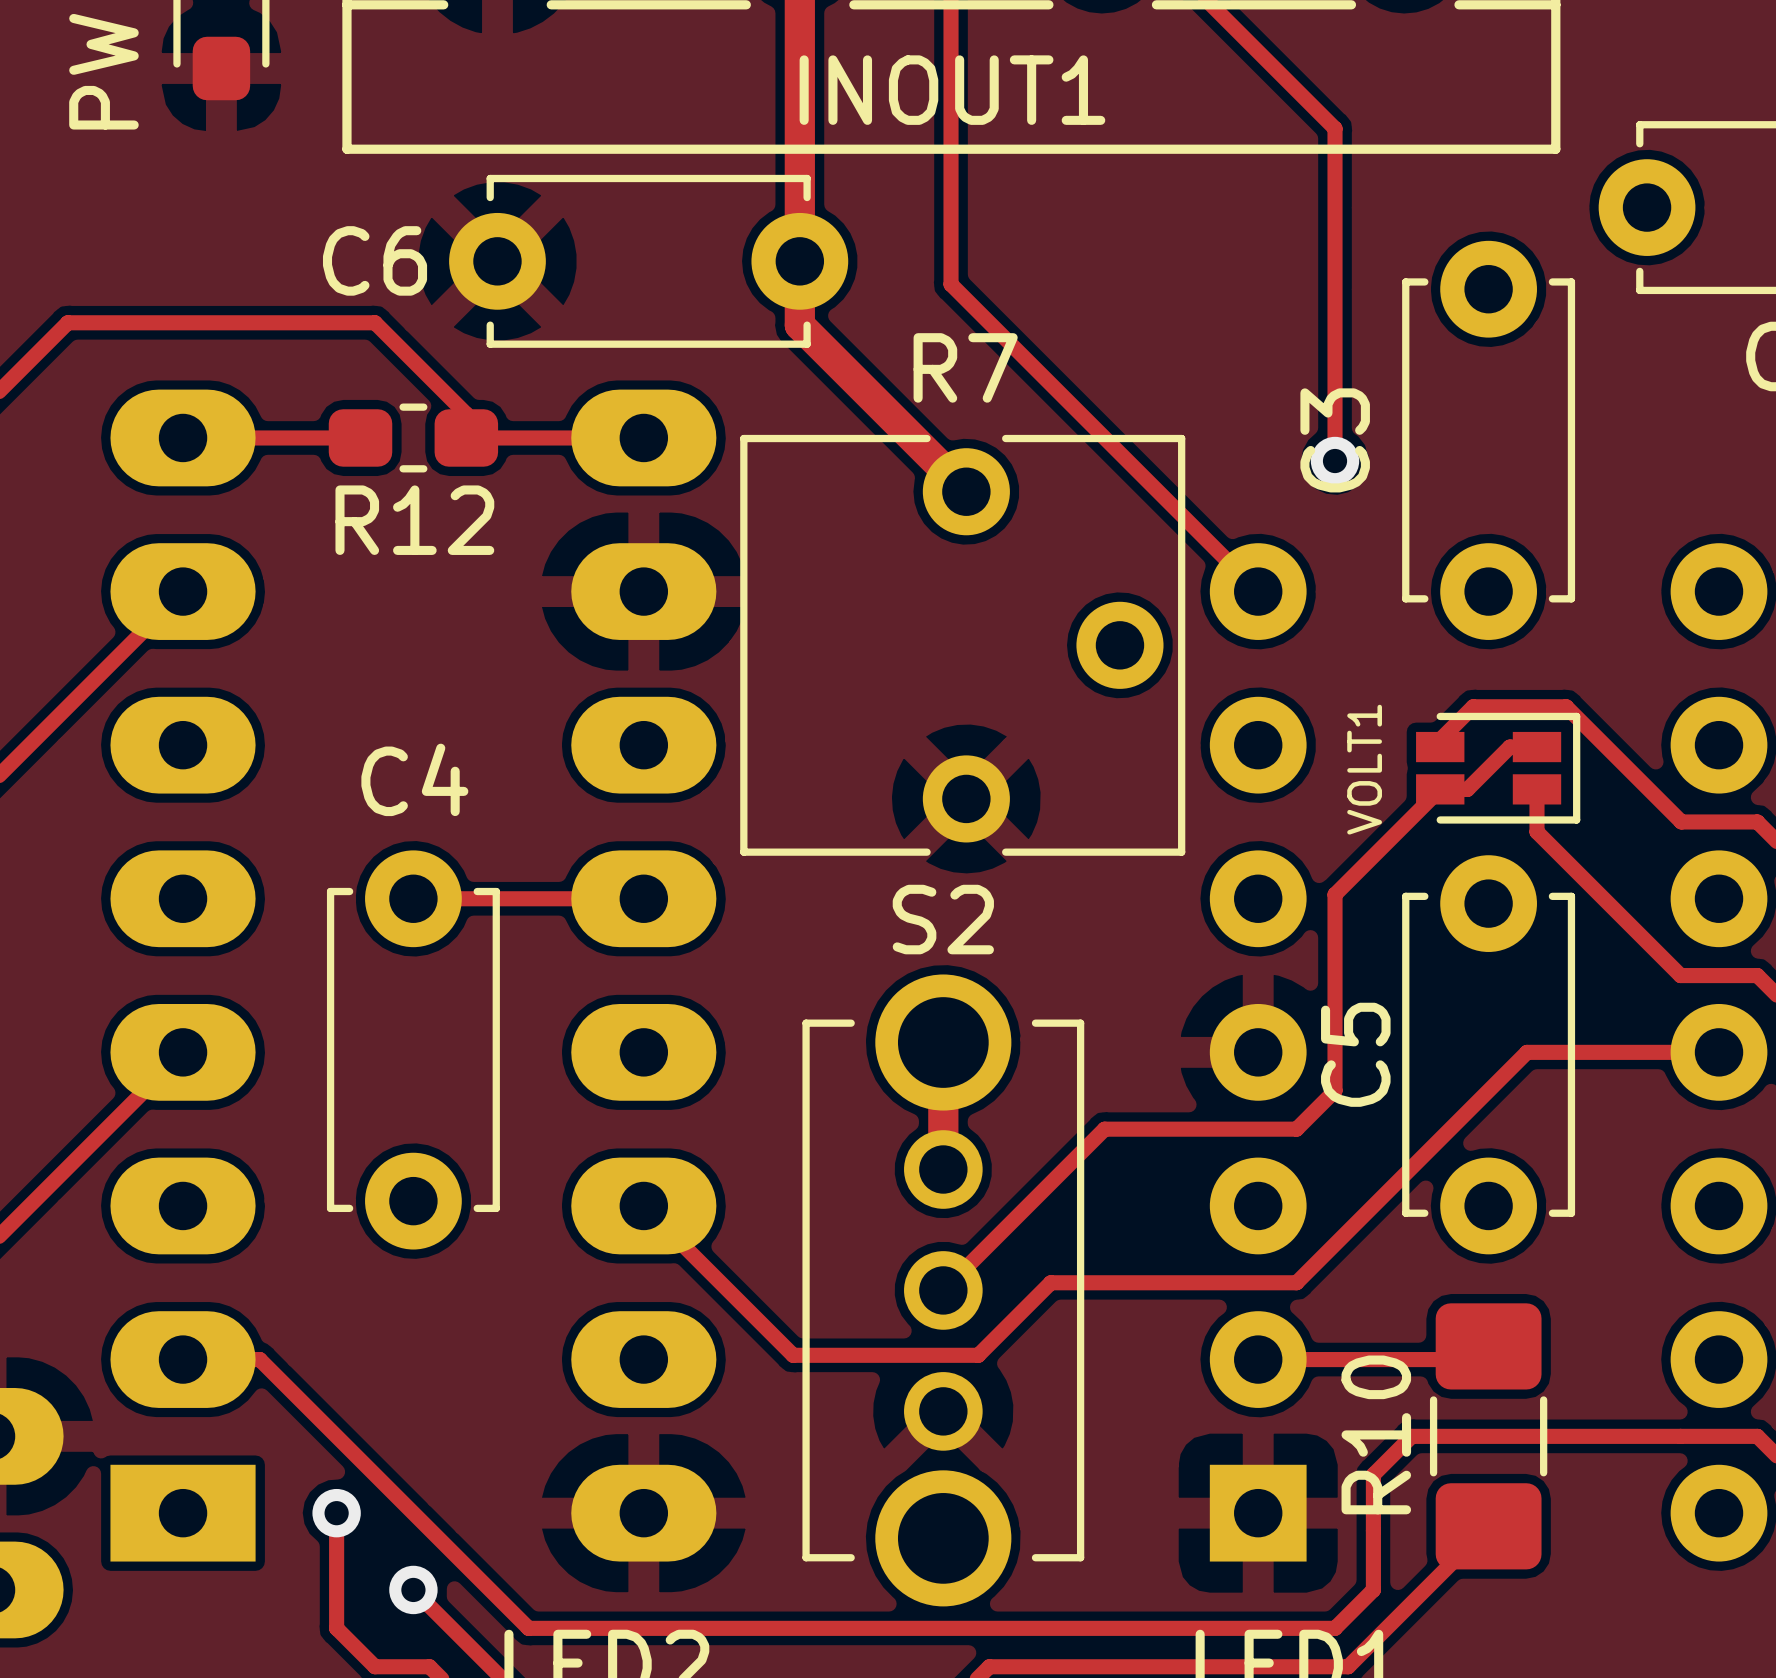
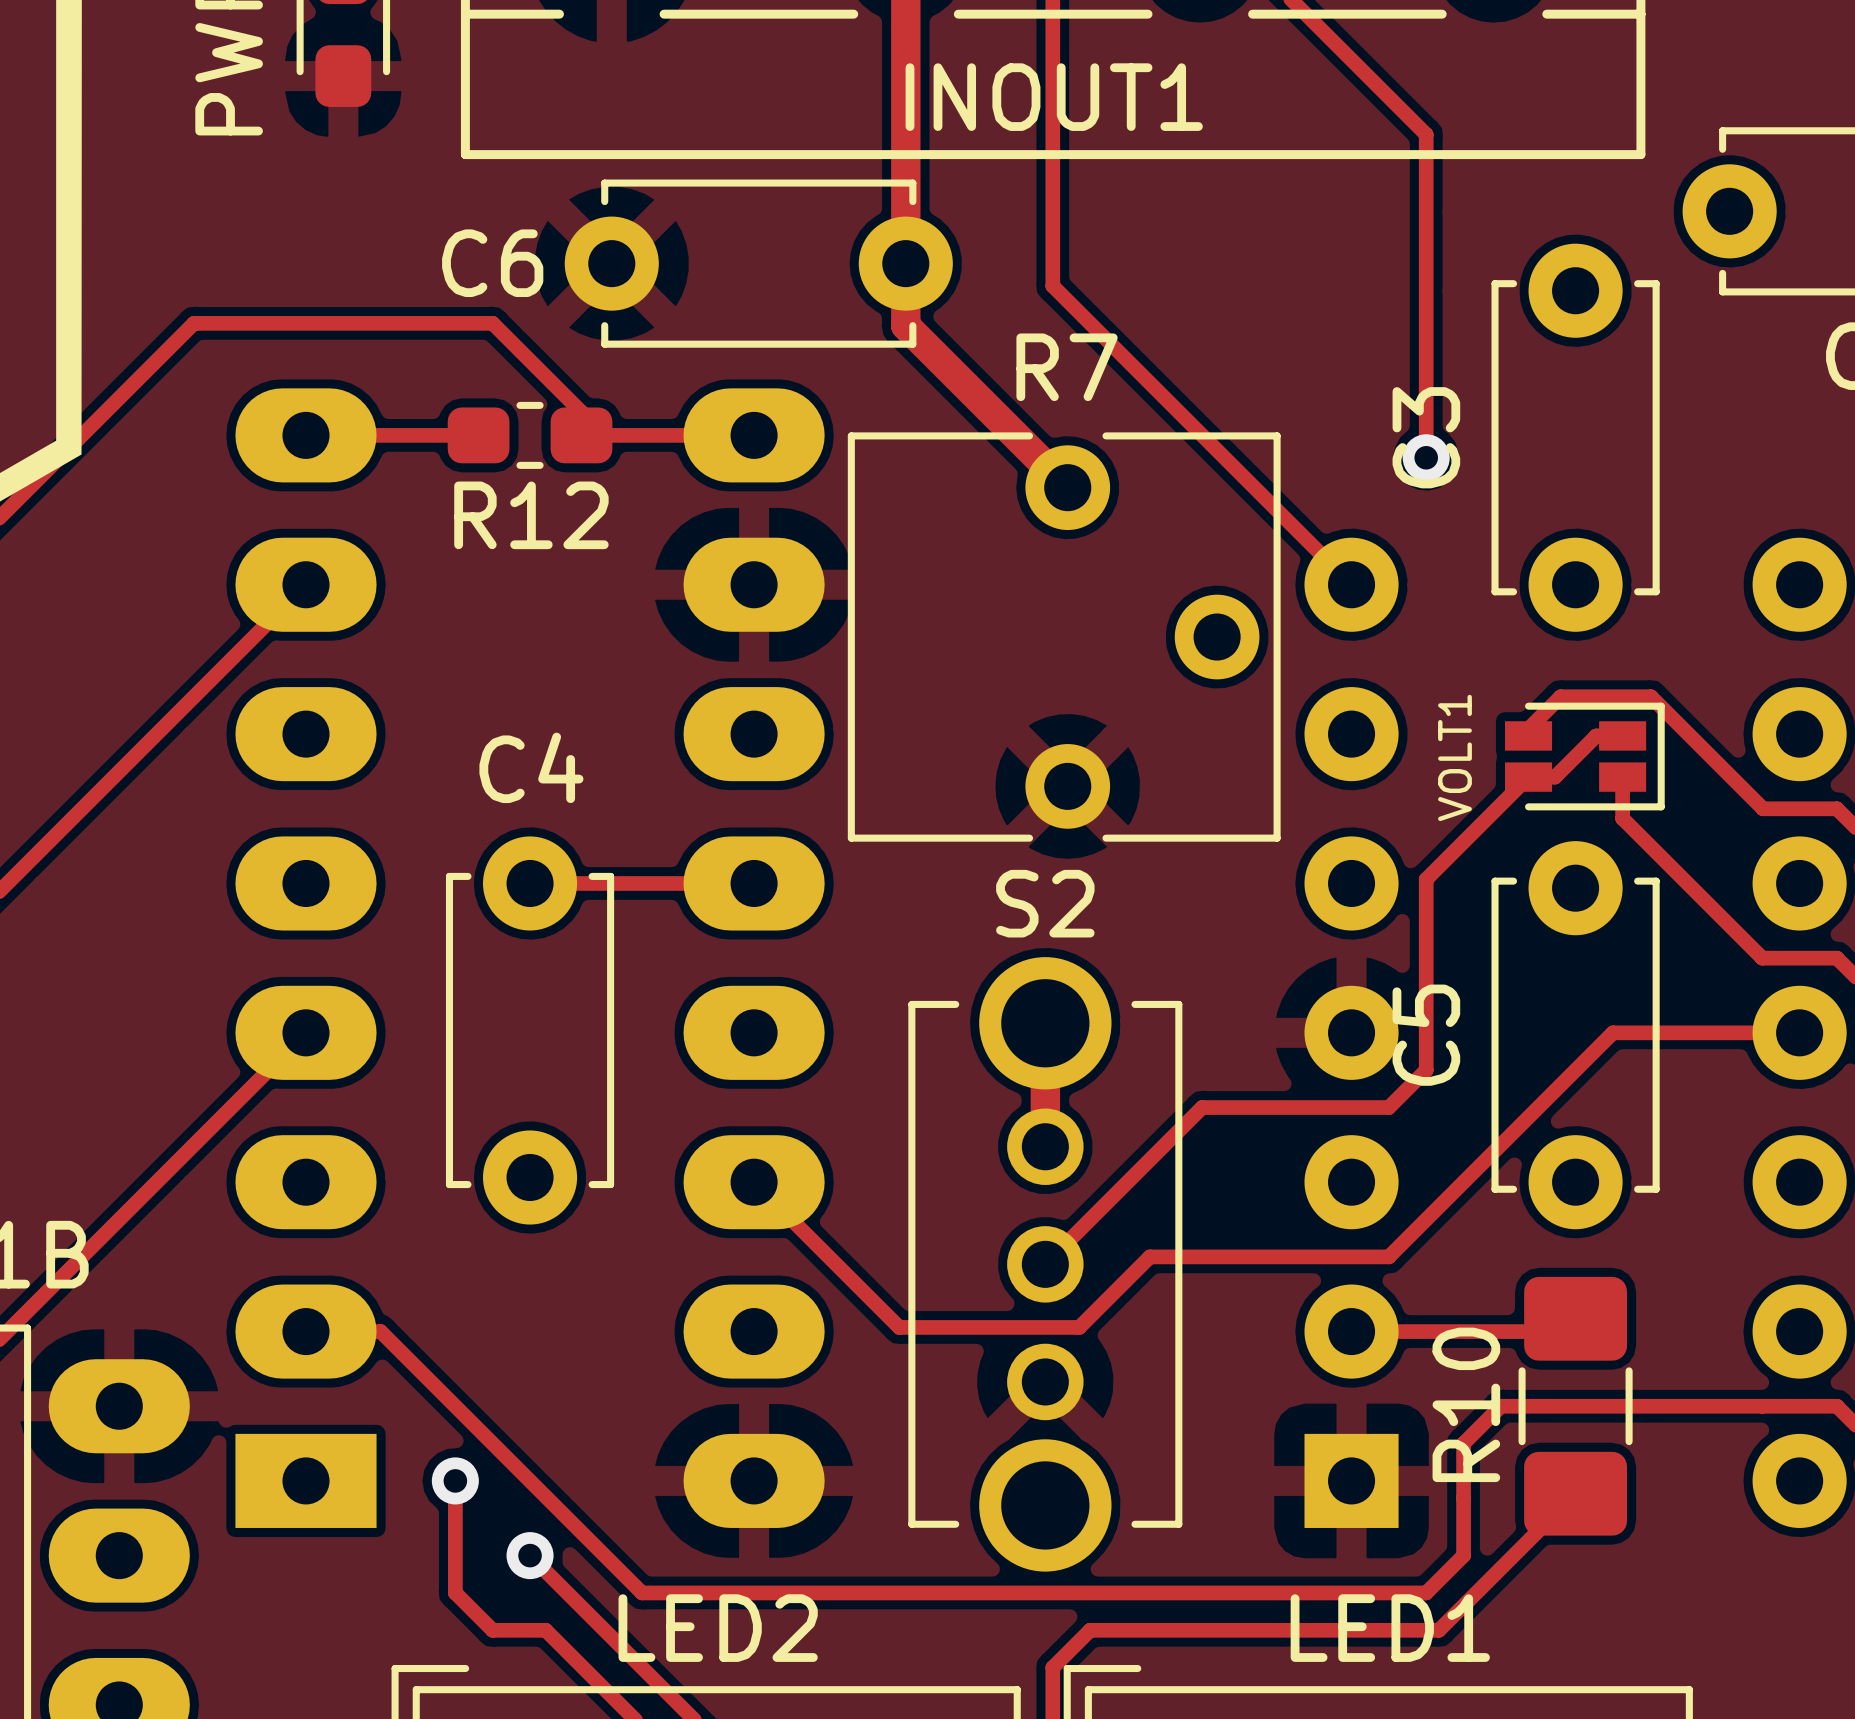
C5 name position: C5 (1355, 1054) -> C5 (1426, 1035)

